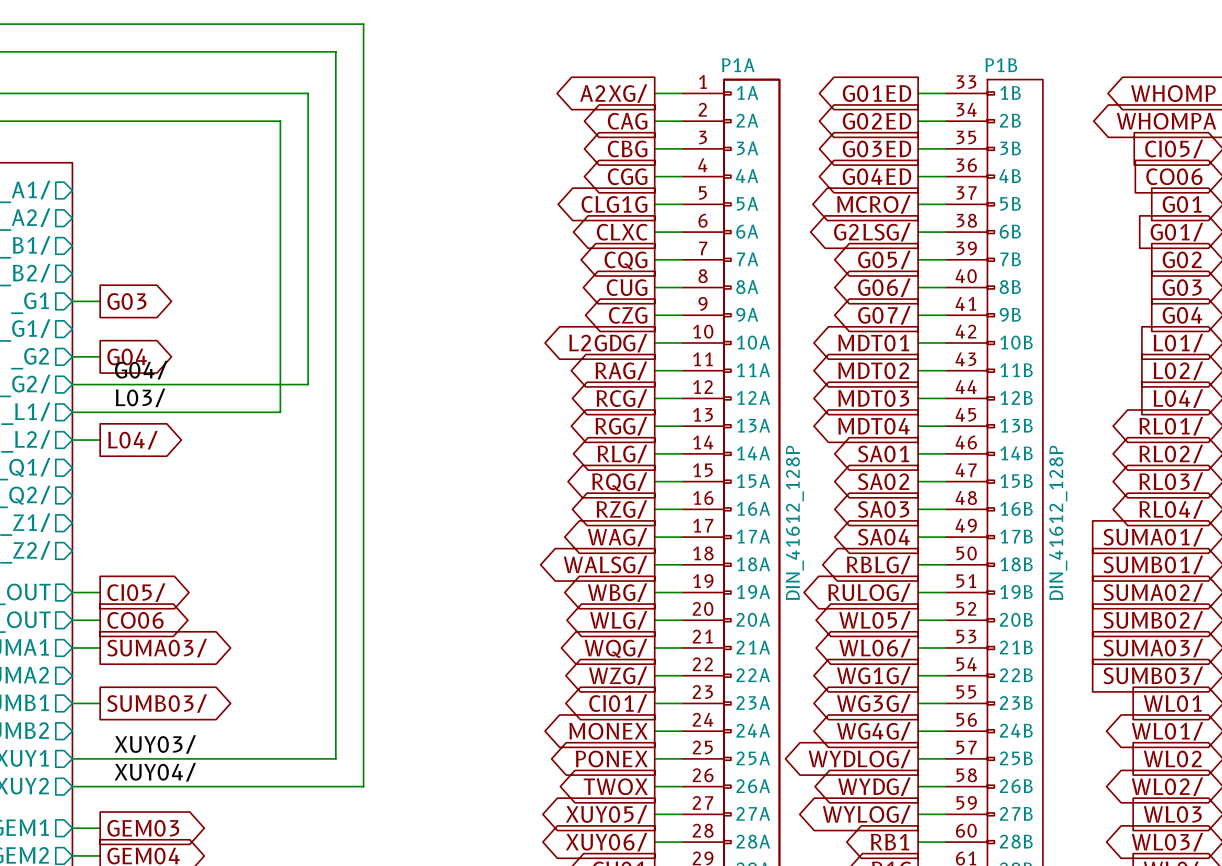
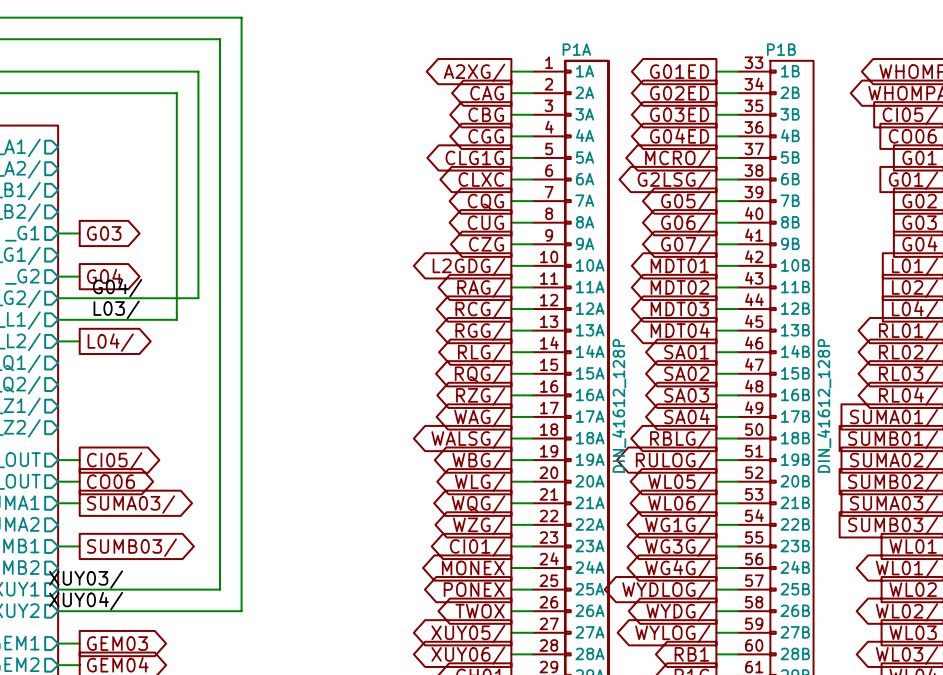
wire: (308, 24) (363, 24) (363, 786) (308, 786) -> (241, 298) (241, 611)
wire: (280, 51) (335, 51) (335, 758) (280, 758) -> (219, 319) (219, 589)
wire: (252, 93) (308, 93) -> (241, 17) (241, 71)
wire: (224, 121) (280, 121) -> (219, 39) (219, 93)
wire: (252, 384) (308, 384) -> (198, 298) (198, 71)
wire: (224, 412) (280, 412) -> (176, 319) (176, 93)
label position: XUY03/ (155, 744) -> XUY03/ (86, 579)
label position: XUY04/ (155, 772) -> XUY04/ (86, 601)

